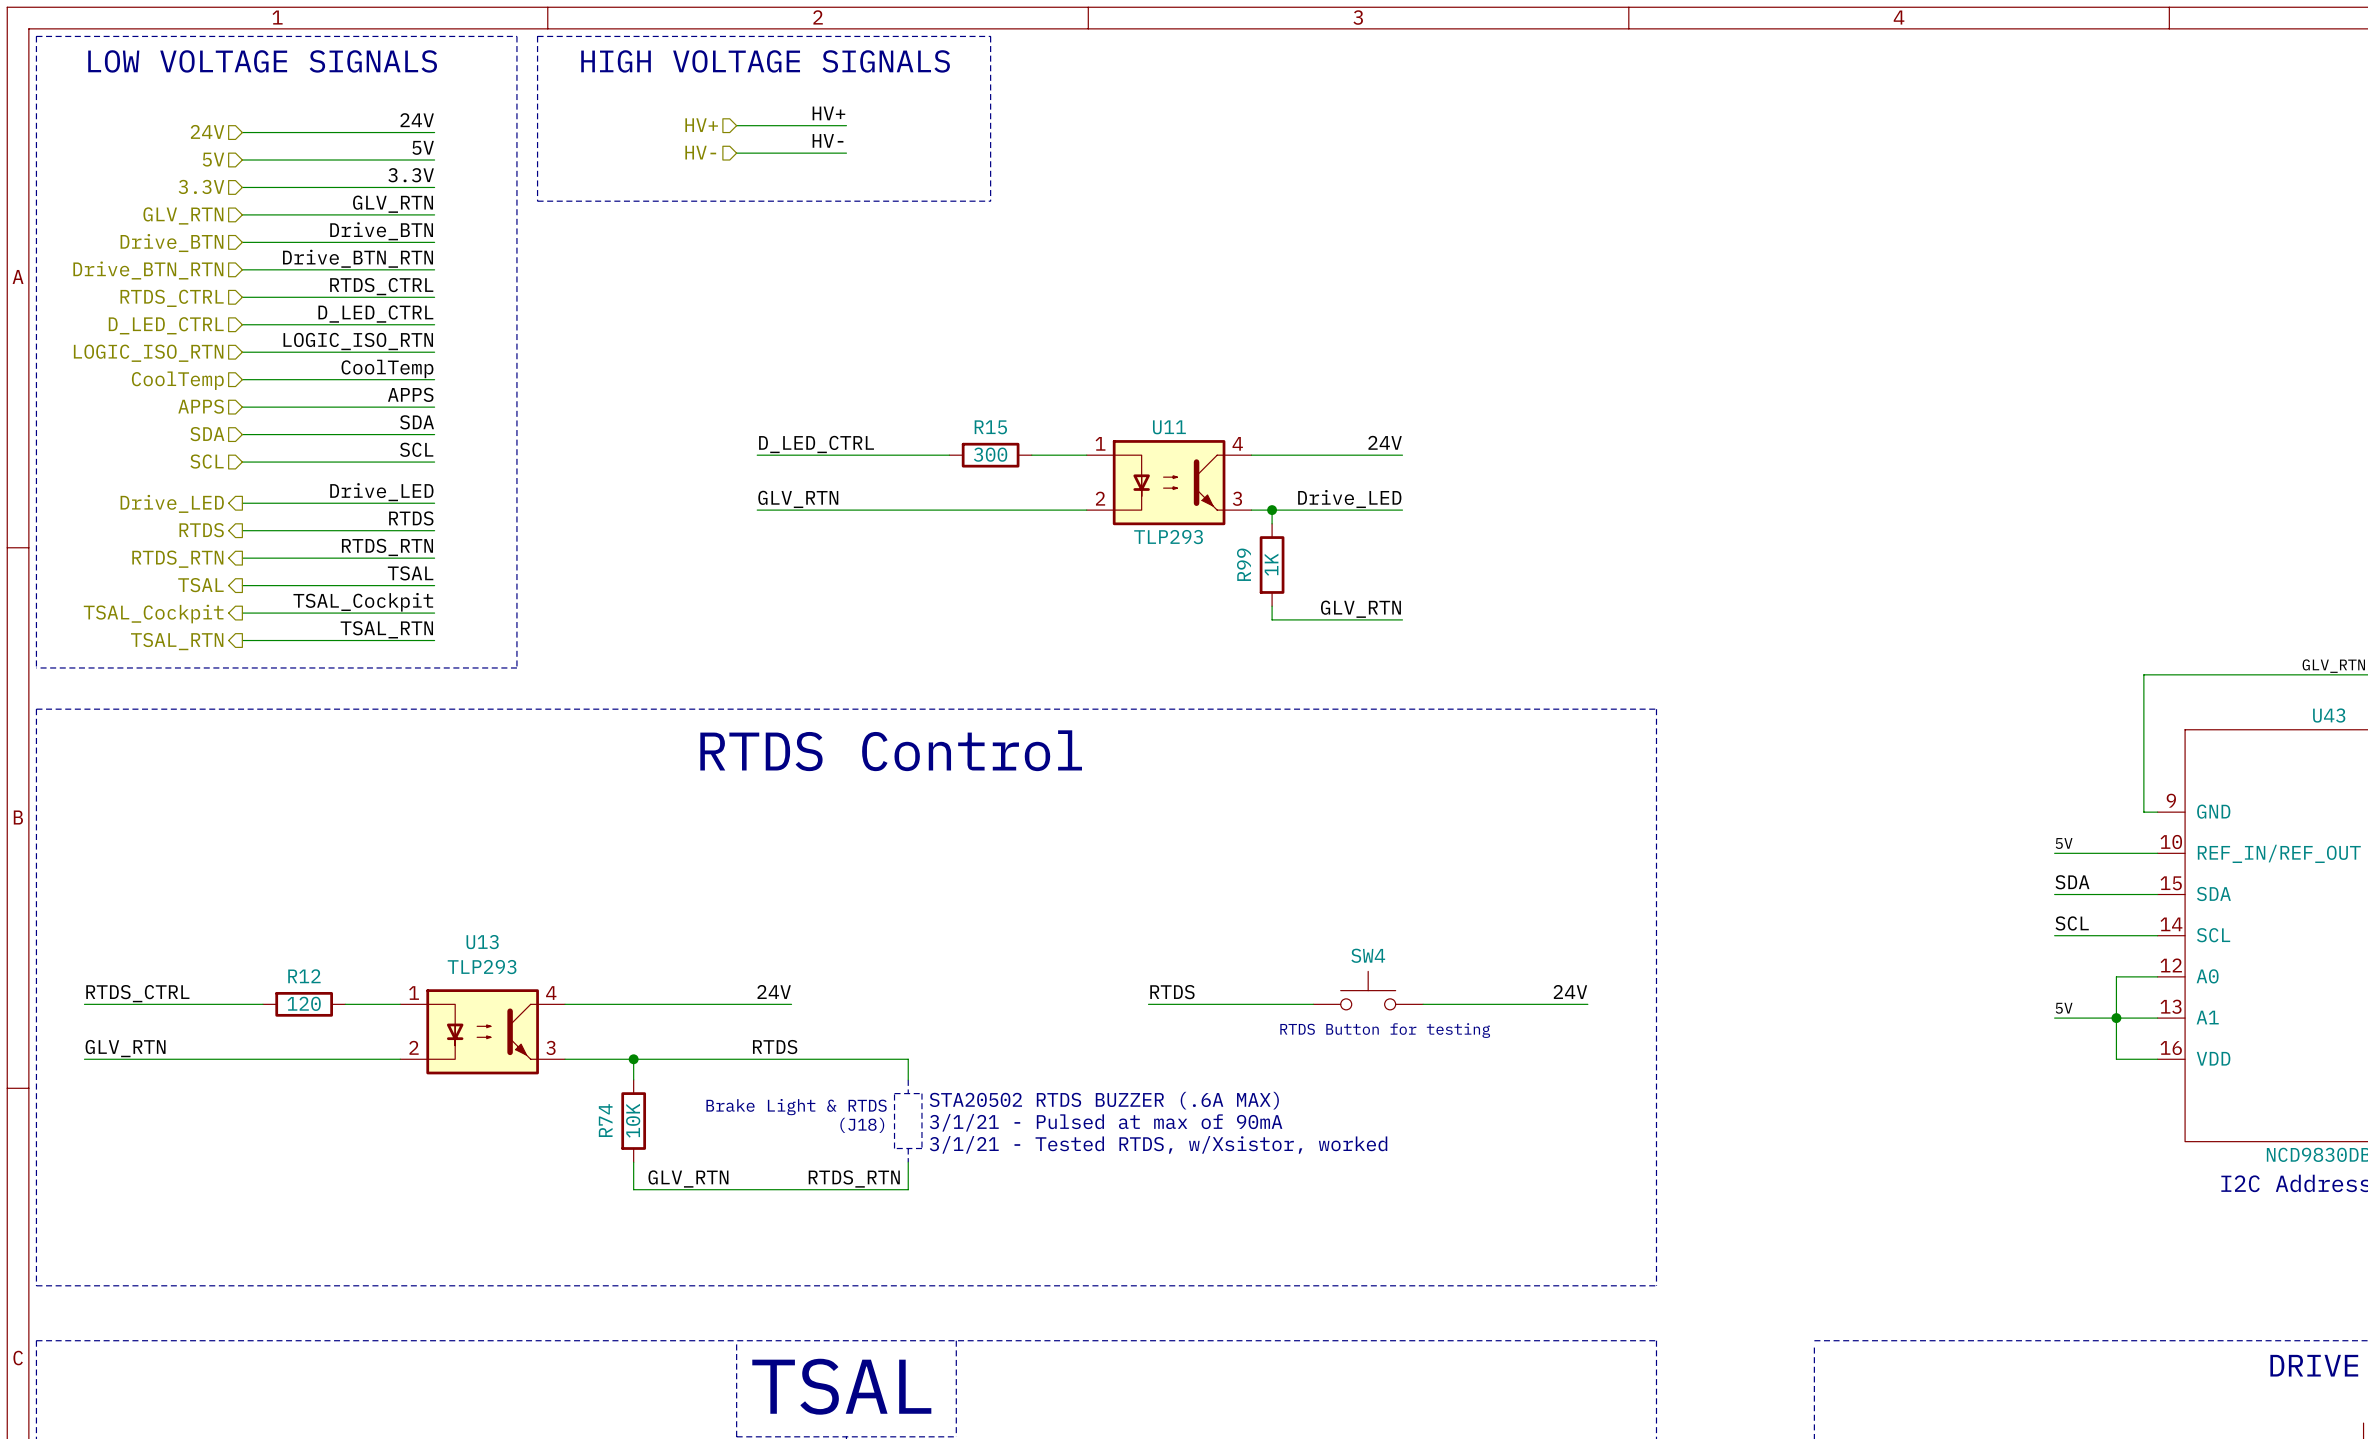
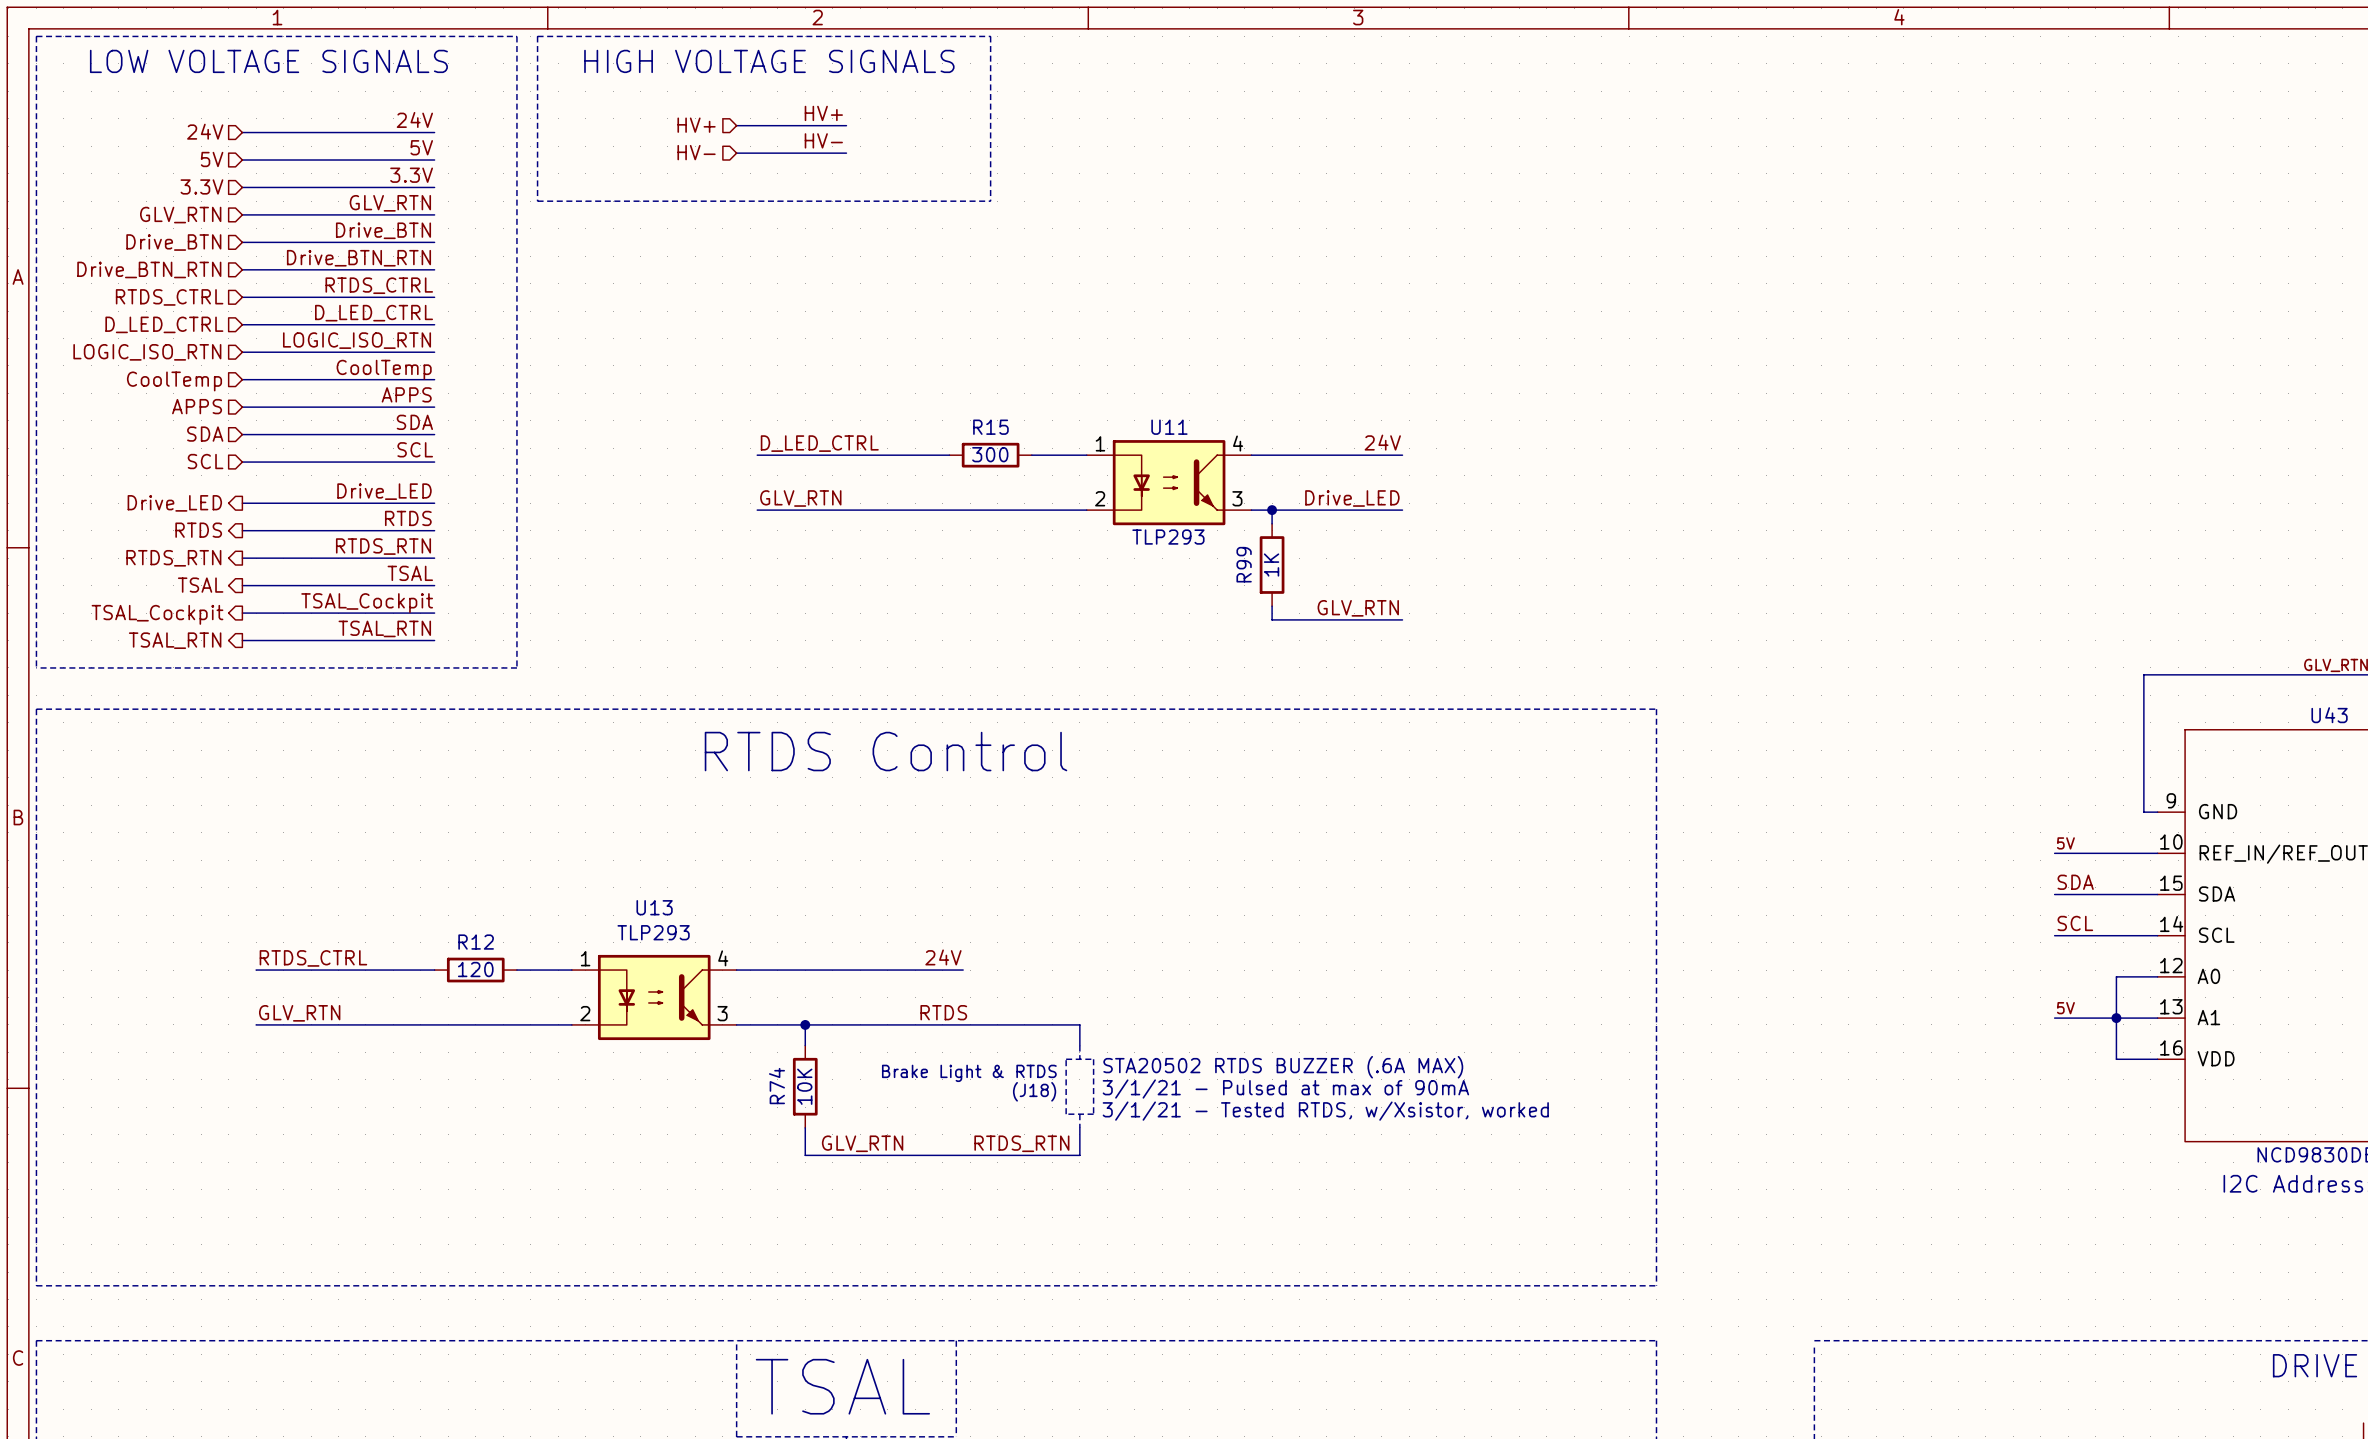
SW4: (1368, 990) -> none
label position: 24V (774, 991) -> 24V (943, 957)
label: 24V (1570, 991) -> none
label: RTDS (1172, 992) -> none
label position: RTDS_CTRL (137, 993) -> RTDS_CTRL (313, 958)
wire: (84, 1004) (262, 1004) -> (256, 970) (434, 970)
R12 position: (304, 1004) -> (475, 970)
wire: (345, 1004) (400, 1004) -> (516, 970) (571, 970)
wire: (565, 1004) (791, 1004) -> (736, 970) (963, 970)
wire: (1148, 1004) (1313, 1004) -> none
wire: (1423, 1004) (1587, 1004) -> none
label: none -> RTDS (943, 1012)
junction: none -> (805, 1024)
text: RTDS Button for testing (1385, 1030) -> none
U13 position: (482, 1031) -> (654, 997)
label: RTDS (775, 1047) -> none
label position: GLV_RTN (125, 1048) -> GLV_RTN (299, 1013)
wire: (84, 1059) (400, 1059) -> (256, 1024) (571, 1024)
wire: (565, 1059) (908, 1059) (908, 1079) -> (736, 1024) (1079, 1024) (1079, 1045)
wire: (633, 1059) (633, 1079) -> (805, 1024) (805, 1045)
junction: (633, 1059) -> none
line: (908, 1079) (908, 1093) -> (1079, 1045) (1079, 1059)
line: (894, 1093) (921, 1093) (921, 1148) (894, 1148) (894, 1093) -> (1066, 1059) (1093, 1059) (1093, 1114) (1066, 1114) (1066, 1059)
text position: STA20502 RTDS BUZZER (.6A MAX) (1104, 1100) -> STA20502 RTDS BUZZER (.6A MAX) (1283, 1067)
text position: Brake Light & RTDS (796, 1107) -> Brake Light & RTDS (969, 1073)
R74 position: (633, 1121) -> (805, 1086)
text position: 3/1/21 - Pulsed at max of 90mA (1106, 1122) -> 3/1/21 - Pulsed at max of 90mA (1285, 1089)
text position: (J18) (862, 1125) -> (J18) (1034, 1091)
text position: 3/1/21 - Tested RTDS, w/Xsistor, worked (1158, 1144) -> 3/1/21 - Tested RTDS, w/Xsistor, worked (1325, 1111)
line: (908, 1148) (908, 1162) -> (1079, 1114) (1079, 1127)
wire: (633, 1162) (633, 1189) (908, 1189) (908, 1162) -> (805, 1127) (805, 1155) (1079, 1155) (1079, 1127)
label position: GLV_RTN (688, 1178) -> GLV_RTN (862, 1143)
label position: RTDS_RTN (854, 1178) -> RTDS_RTN (1021, 1143)

